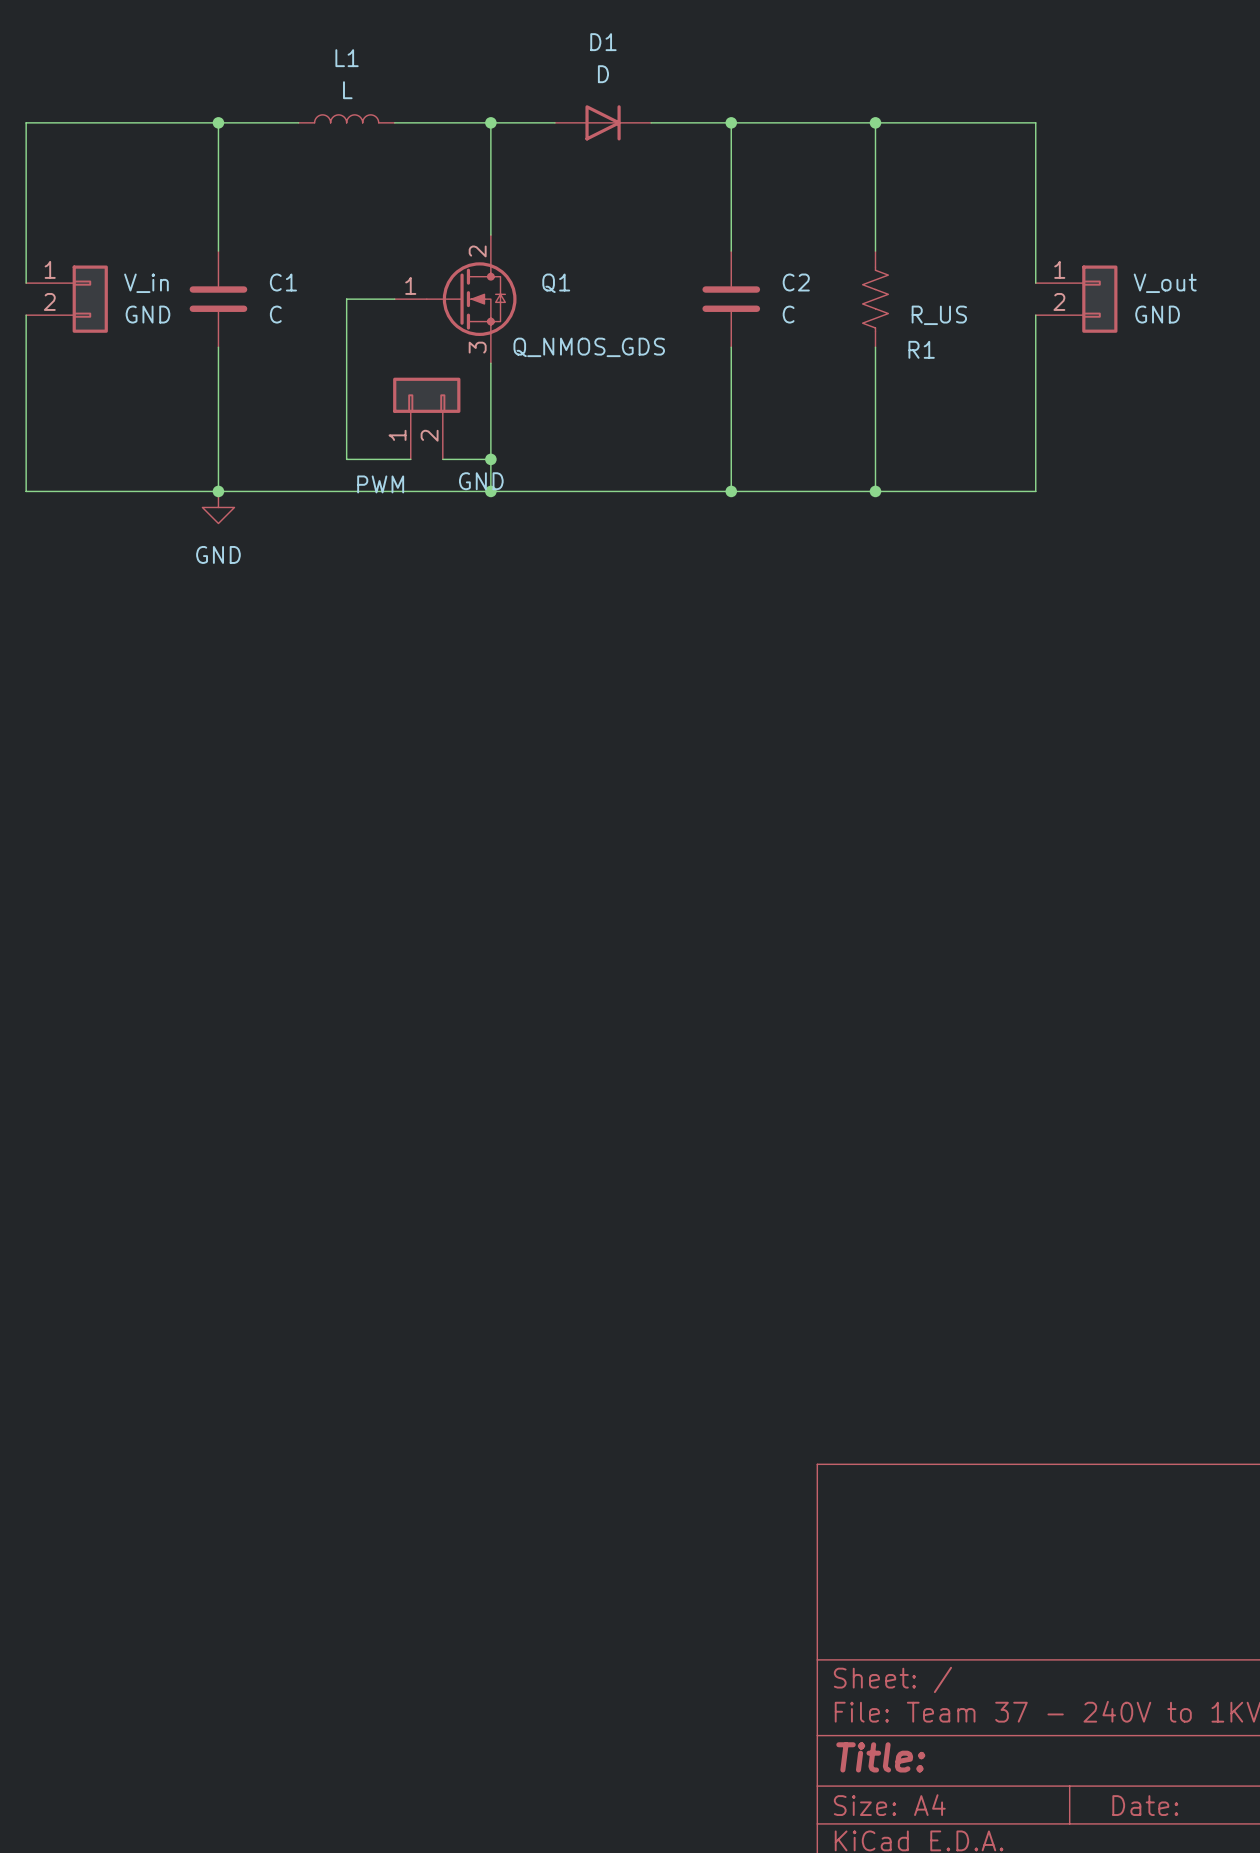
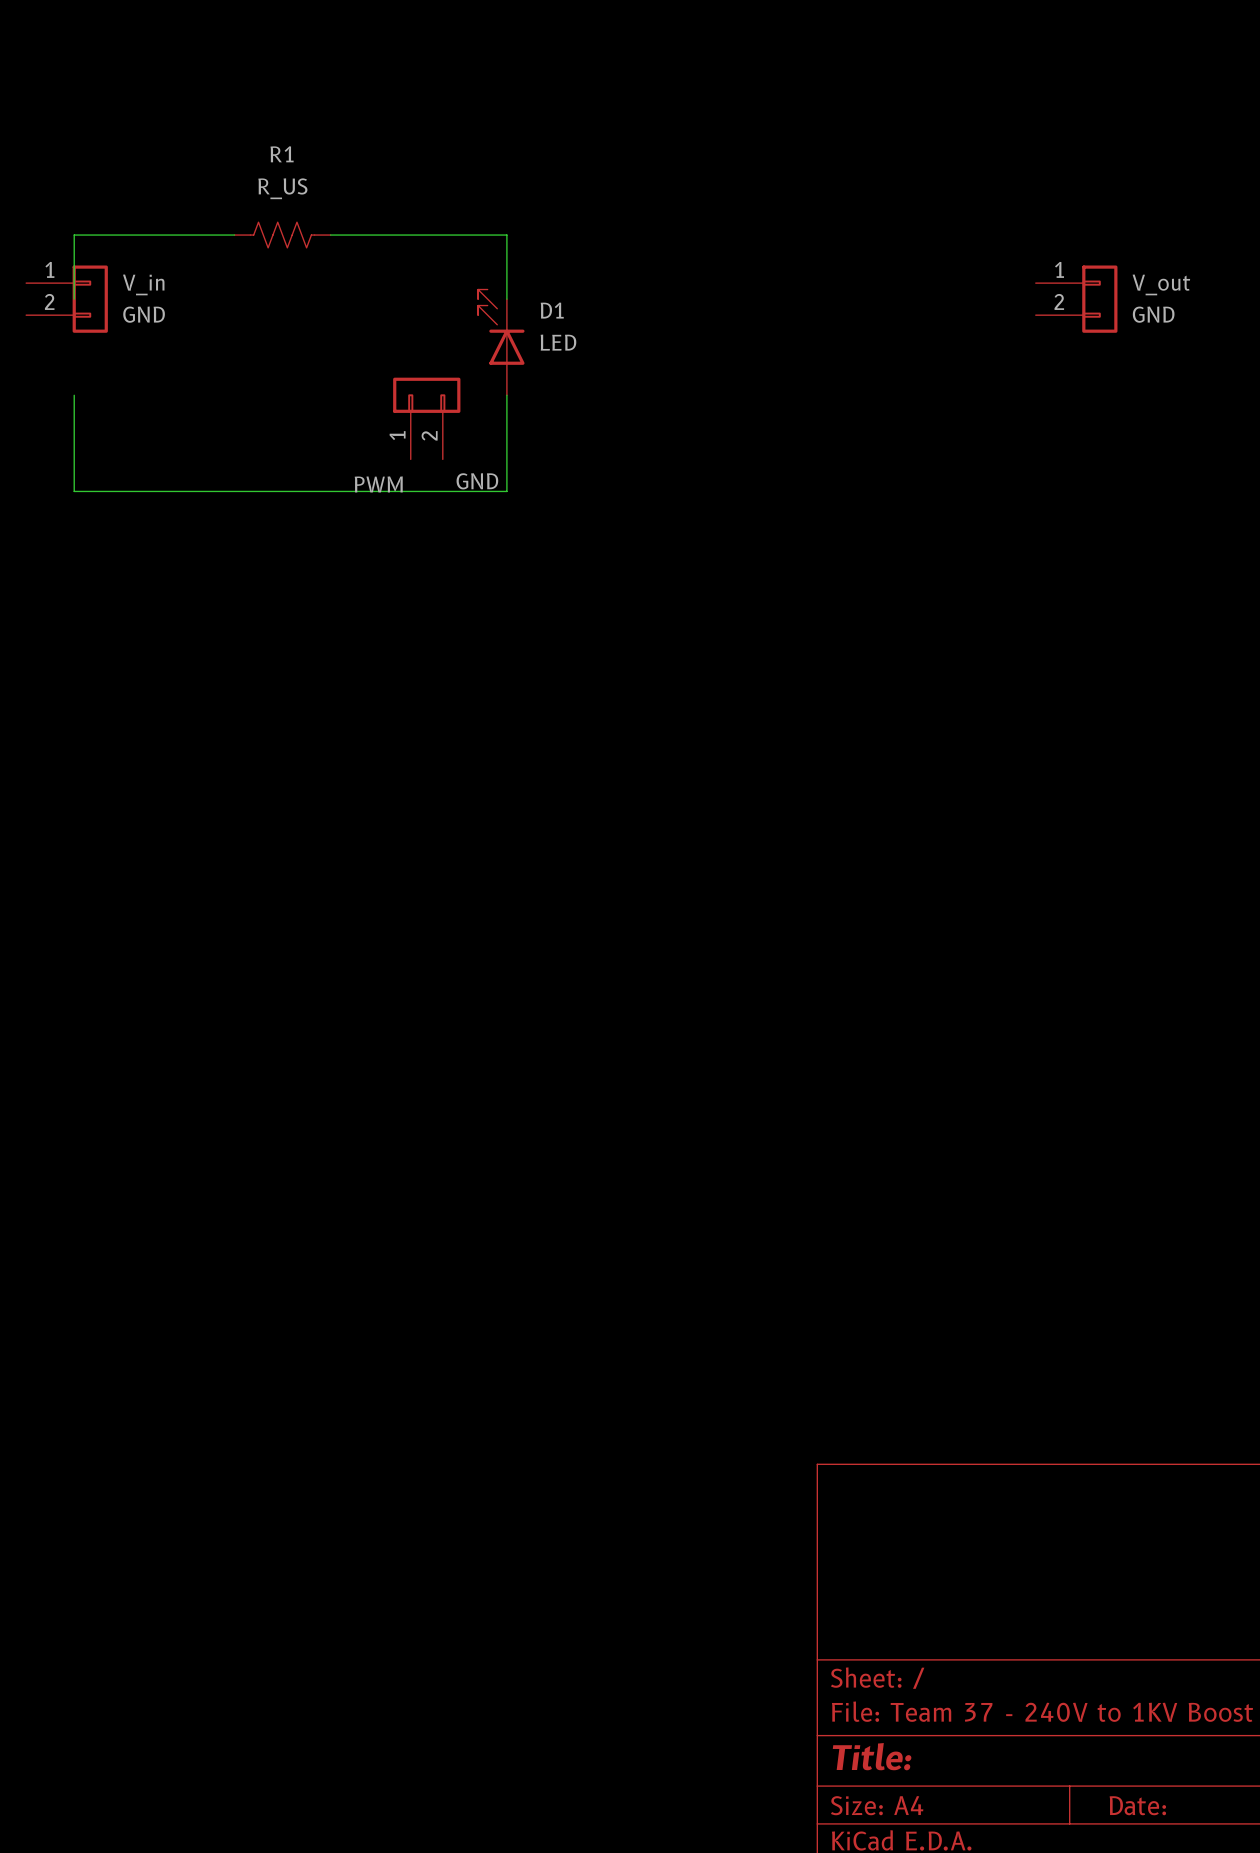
D1 name position: D1 (603, 42) -> D1 (552, 310)
D1 value: D (603, 74) -> LED (558, 342)
D1 symbol: [554, 105, 652, 141] -> [478, 289, 525, 396]
L1: L (346, 118) -> none
wire: (218, 122) (218, 251) -> none
junction: (218, 122) -> none
wire: (298, 122) (26, 122) (26, 283) -> none
wire: (394, 122) (554, 122) -> none
wire: (490, 122) (490, 235) -> none
junction: (490, 122) -> none
wire: (651, 122) (1035, 122) (1035, 283) -> none
wire: (731, 122) (731, 251) -> none
junction: (731, 122) -> none
wire: (875, 122) (875, 251) -> none
junction: (875, 122) -> none
wire: none -> (234, 235) (74, 235) (74, 299)
wire: none -> (330, 235) (506, 235) (506, 299)
C1: C (218, 299) -> none
wire: (394, 299) (346, 299) (346, 459) (410, 459) -> none
Q1: Q_NMOS_GDS (455, 299) -> none
C2: C (731, 299) -> none
R1 rotation: 0° (875, 299) -> 90° clockwise (282, 235)
R1 position: (875, 299) -> (282, 235)
wire: (26, 315) (26, 491) (74, 491) -> (74, 395) (74, 491)
R1 value position: R_US (939, 315) -> R_US (282, 188)
wire: (1035, 315) (1035, 491) (506, 491) -> (506, 395) (506, 491)
wire: (218, 347) (218, 491) -> none
wire: (731, 347) (731, 491) -> none
wire: (875, 347) (875, 491) -> none
R1 name position: R1 (921, 349) -> R1 (282, 154)
wire: (490, 363) (490, 491) -> none
wire: (442, 459) (490, 459) -> none
junction: (490, 459) -> none
junction: (218, 491) -> none
junction: (490, 491) -> none
junction: (731, 491) -> none
junction: (875, 491) -> none
power symbol: GND (218, 507) -> none

